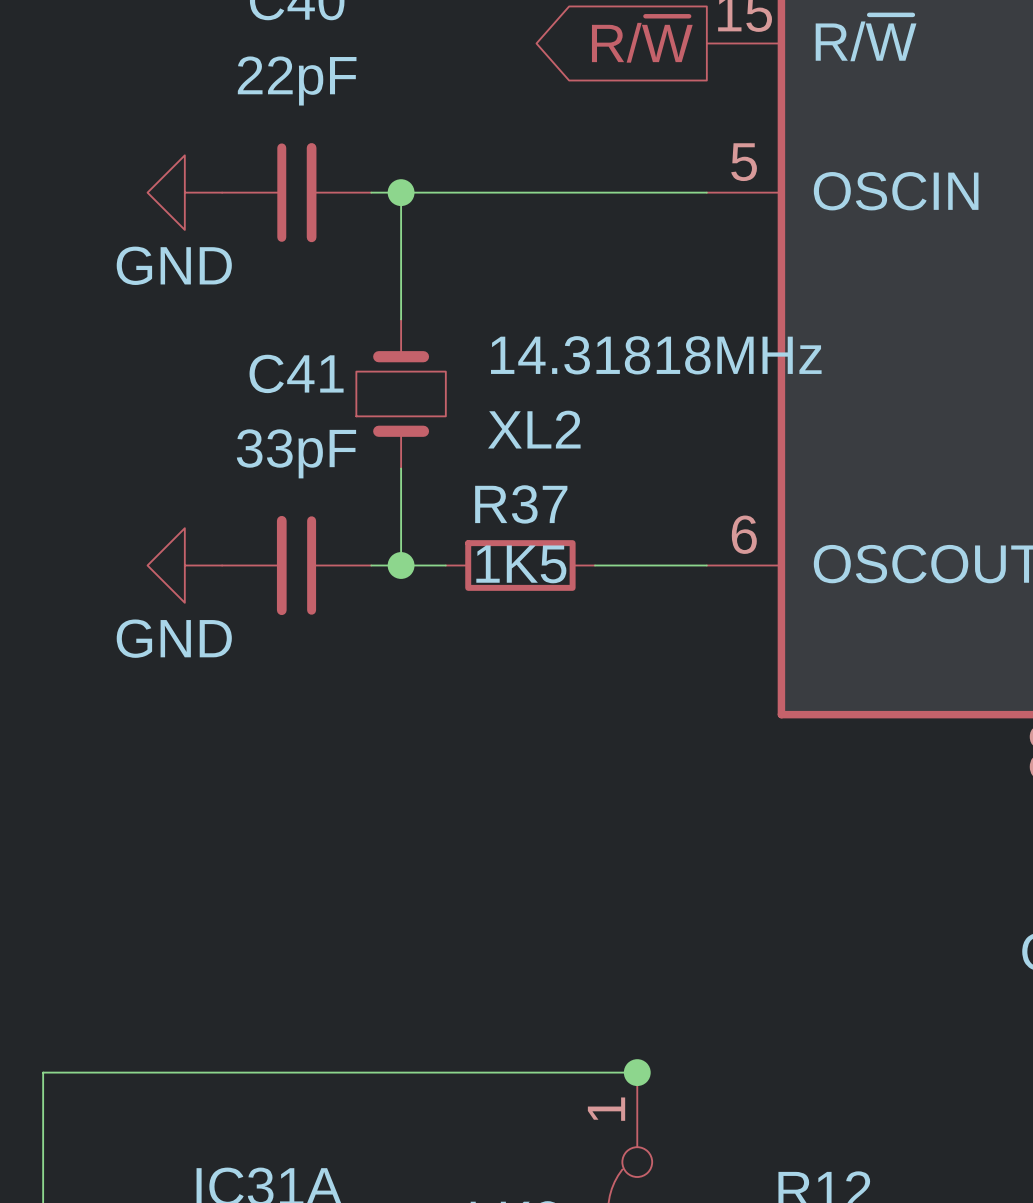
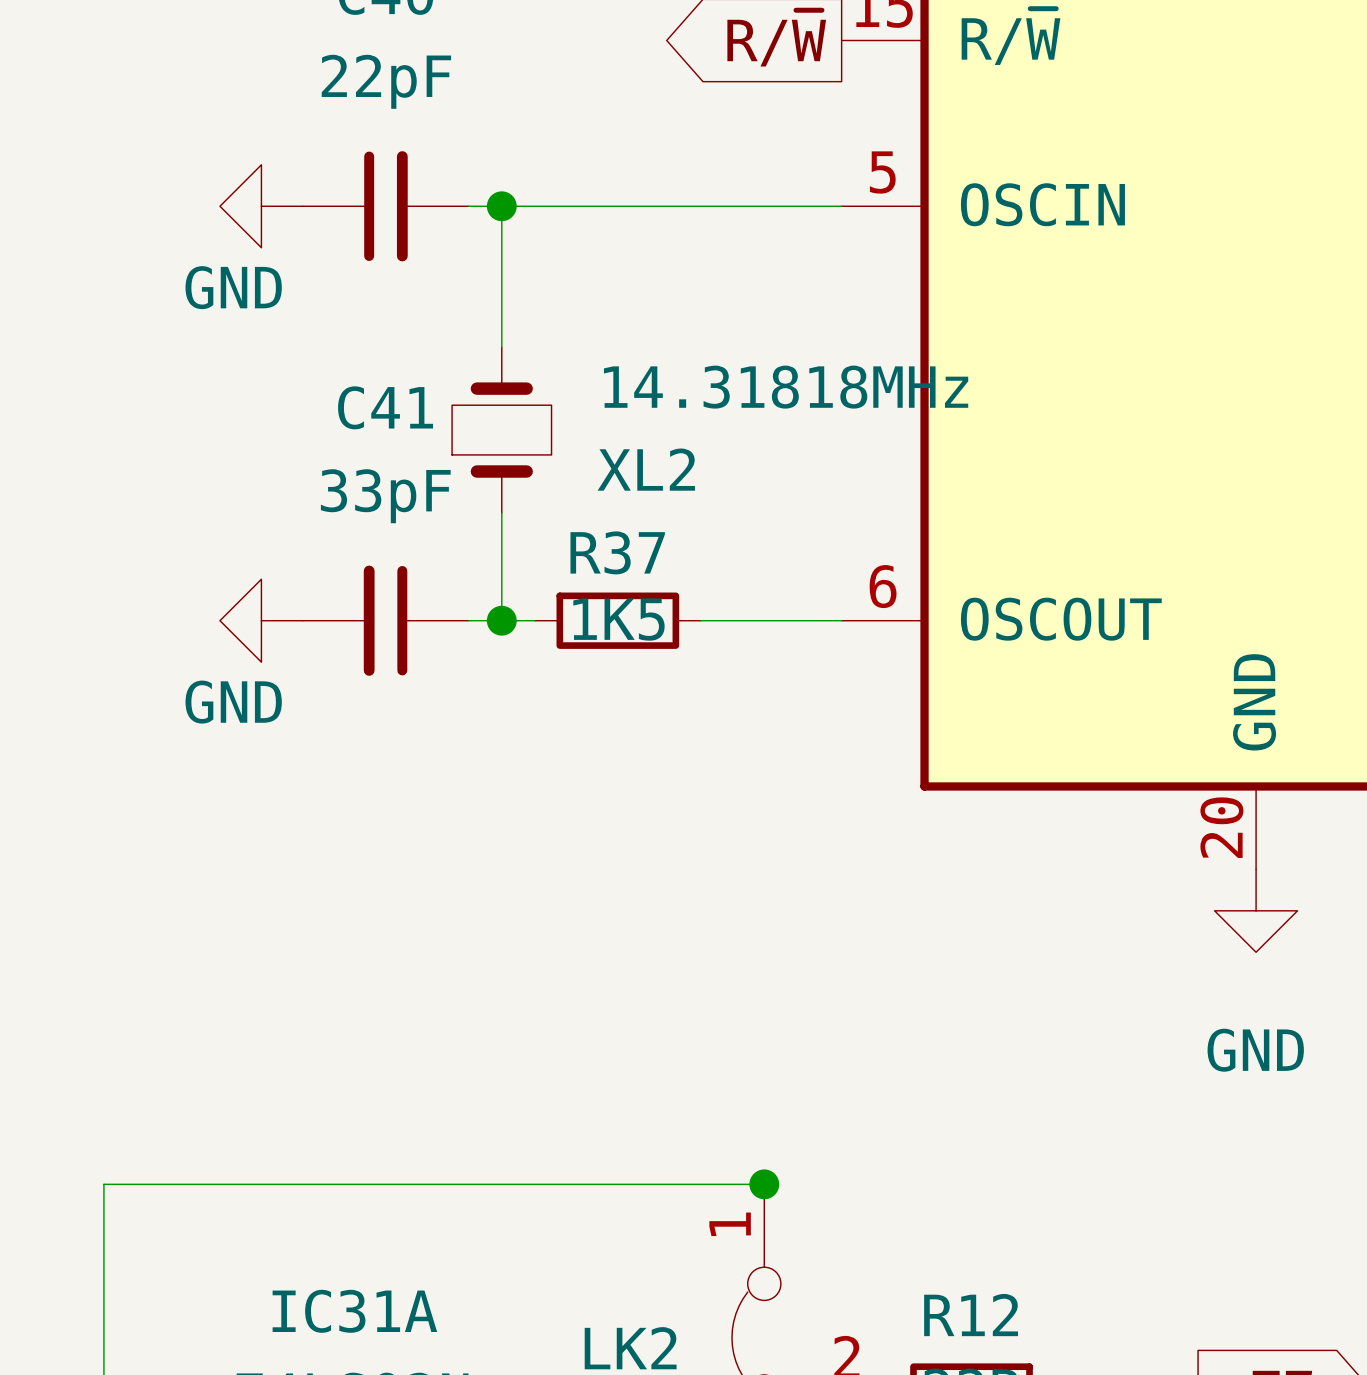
R37 position: (520, 565) -> (617, 620)

